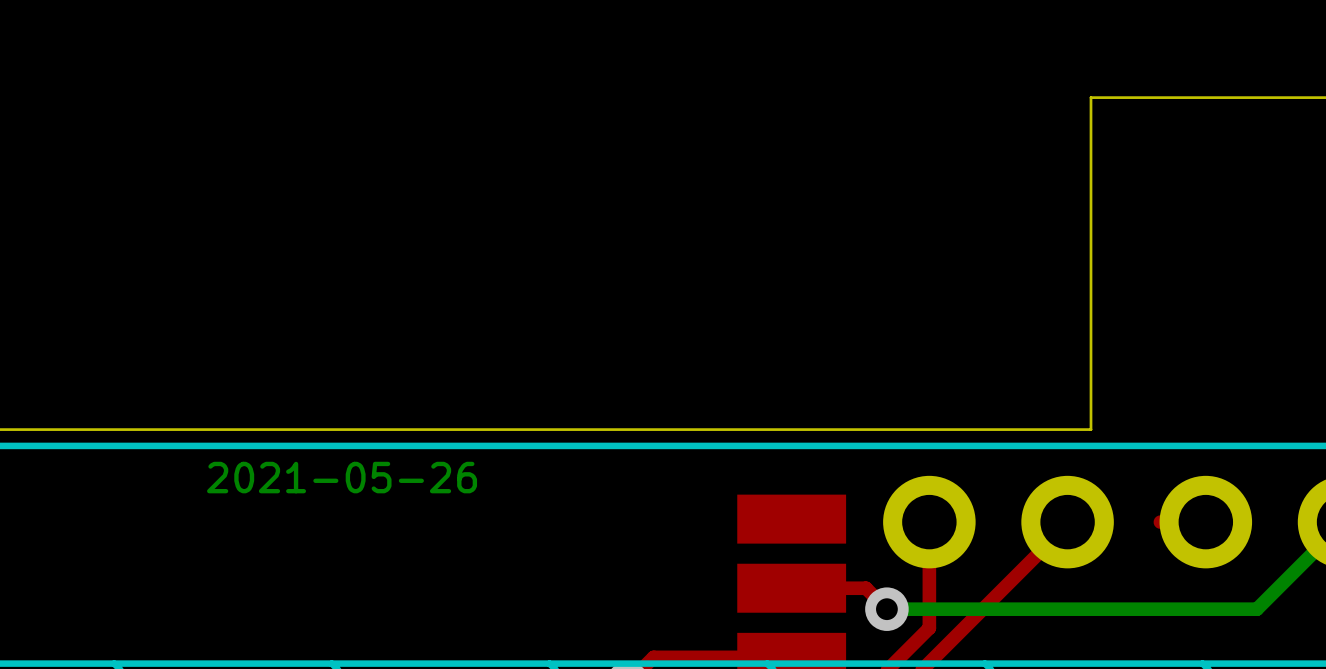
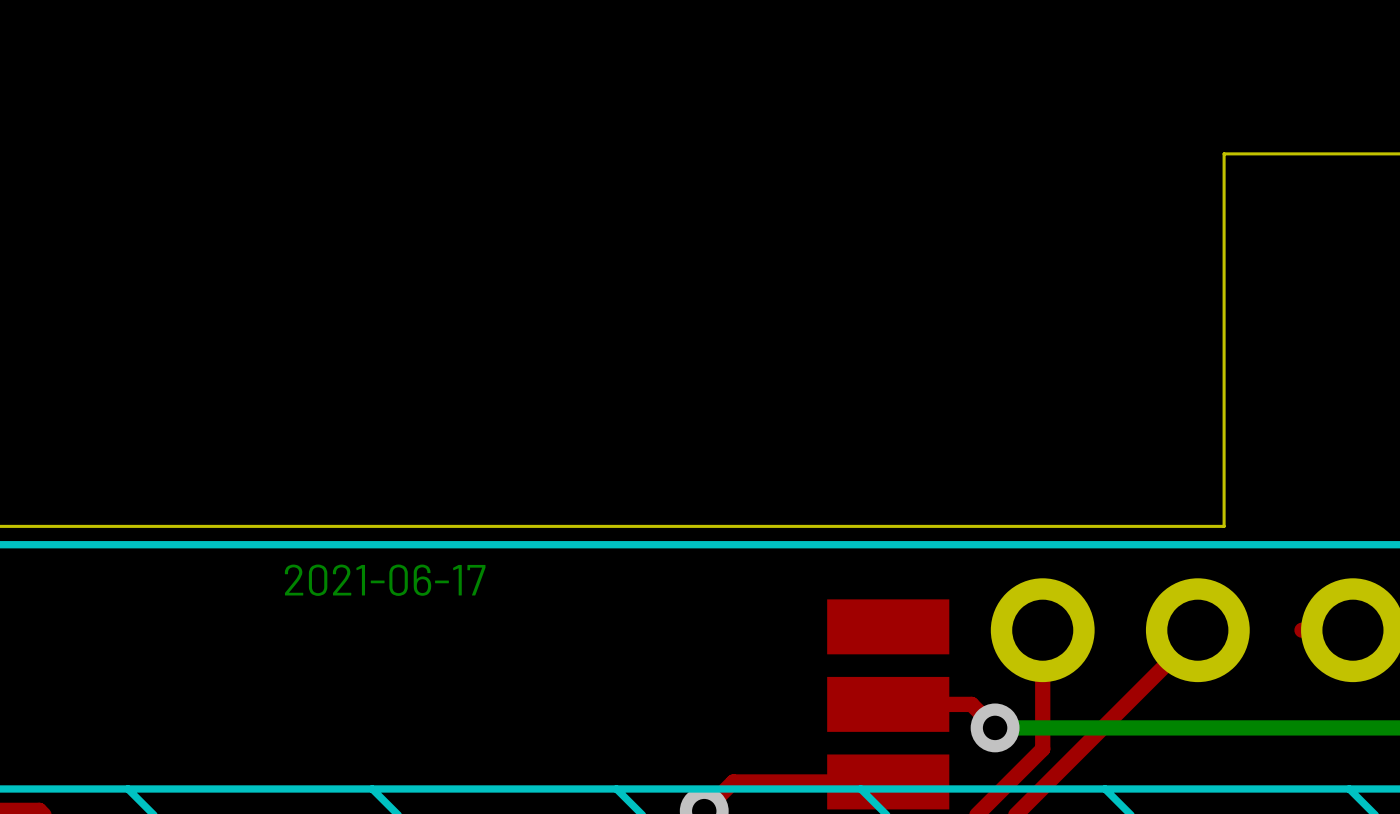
text: 2021-05-26 (342, 477) -> 2021-06-17 (385, 580)

